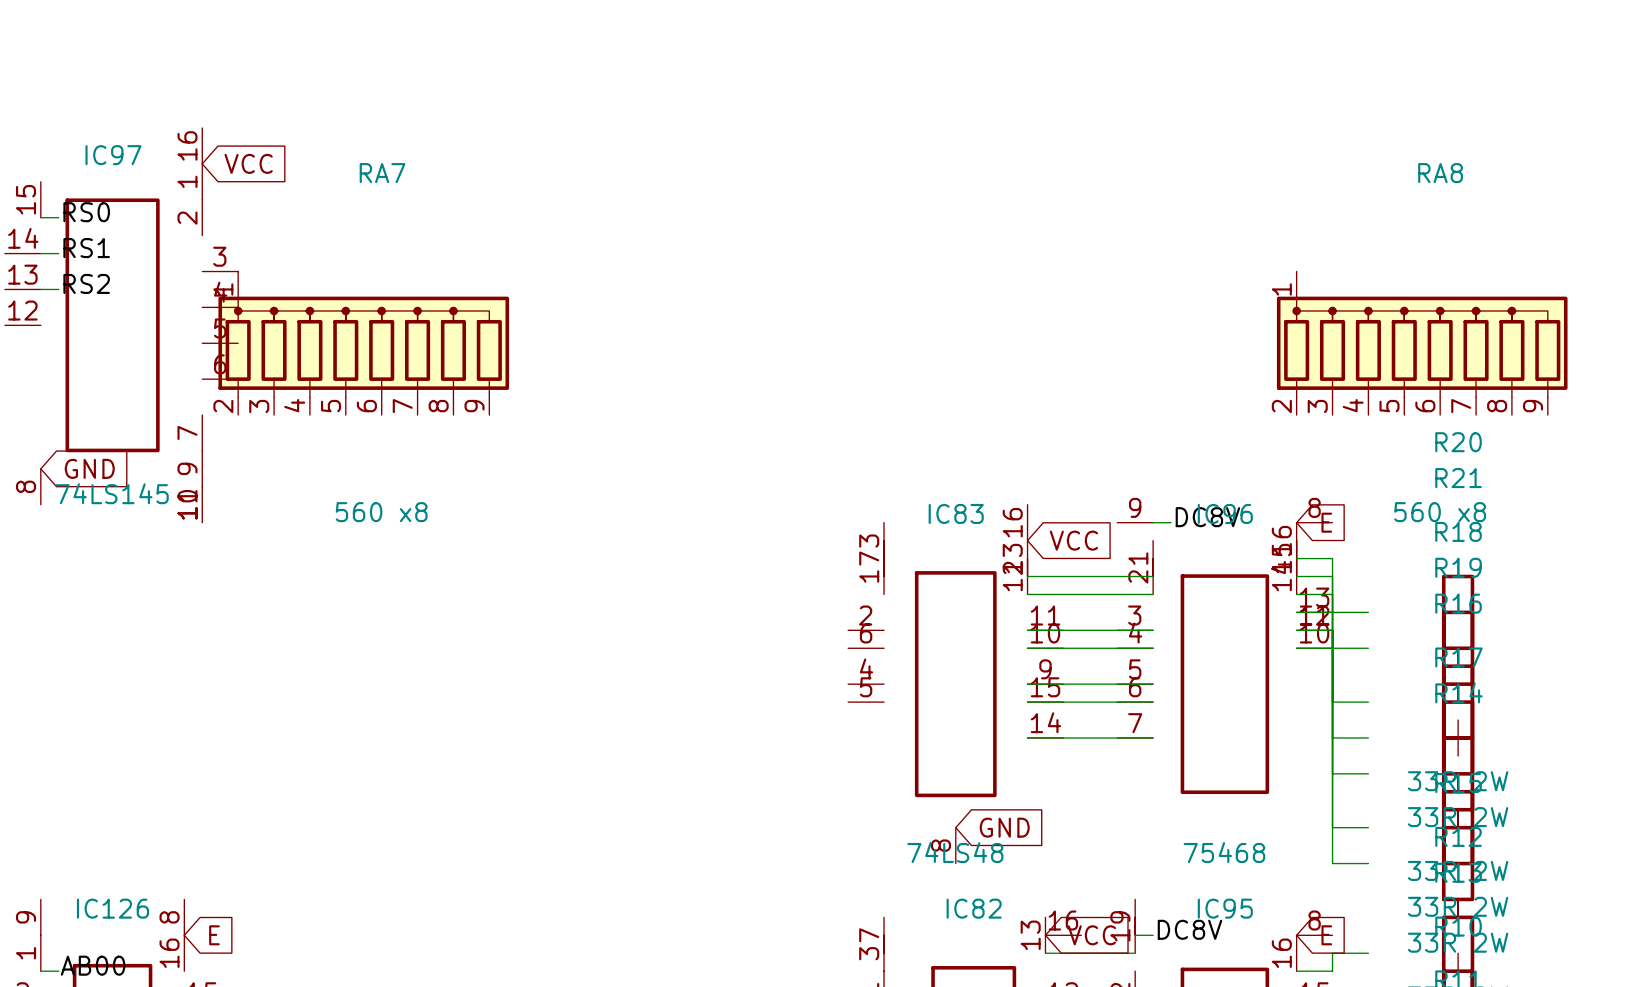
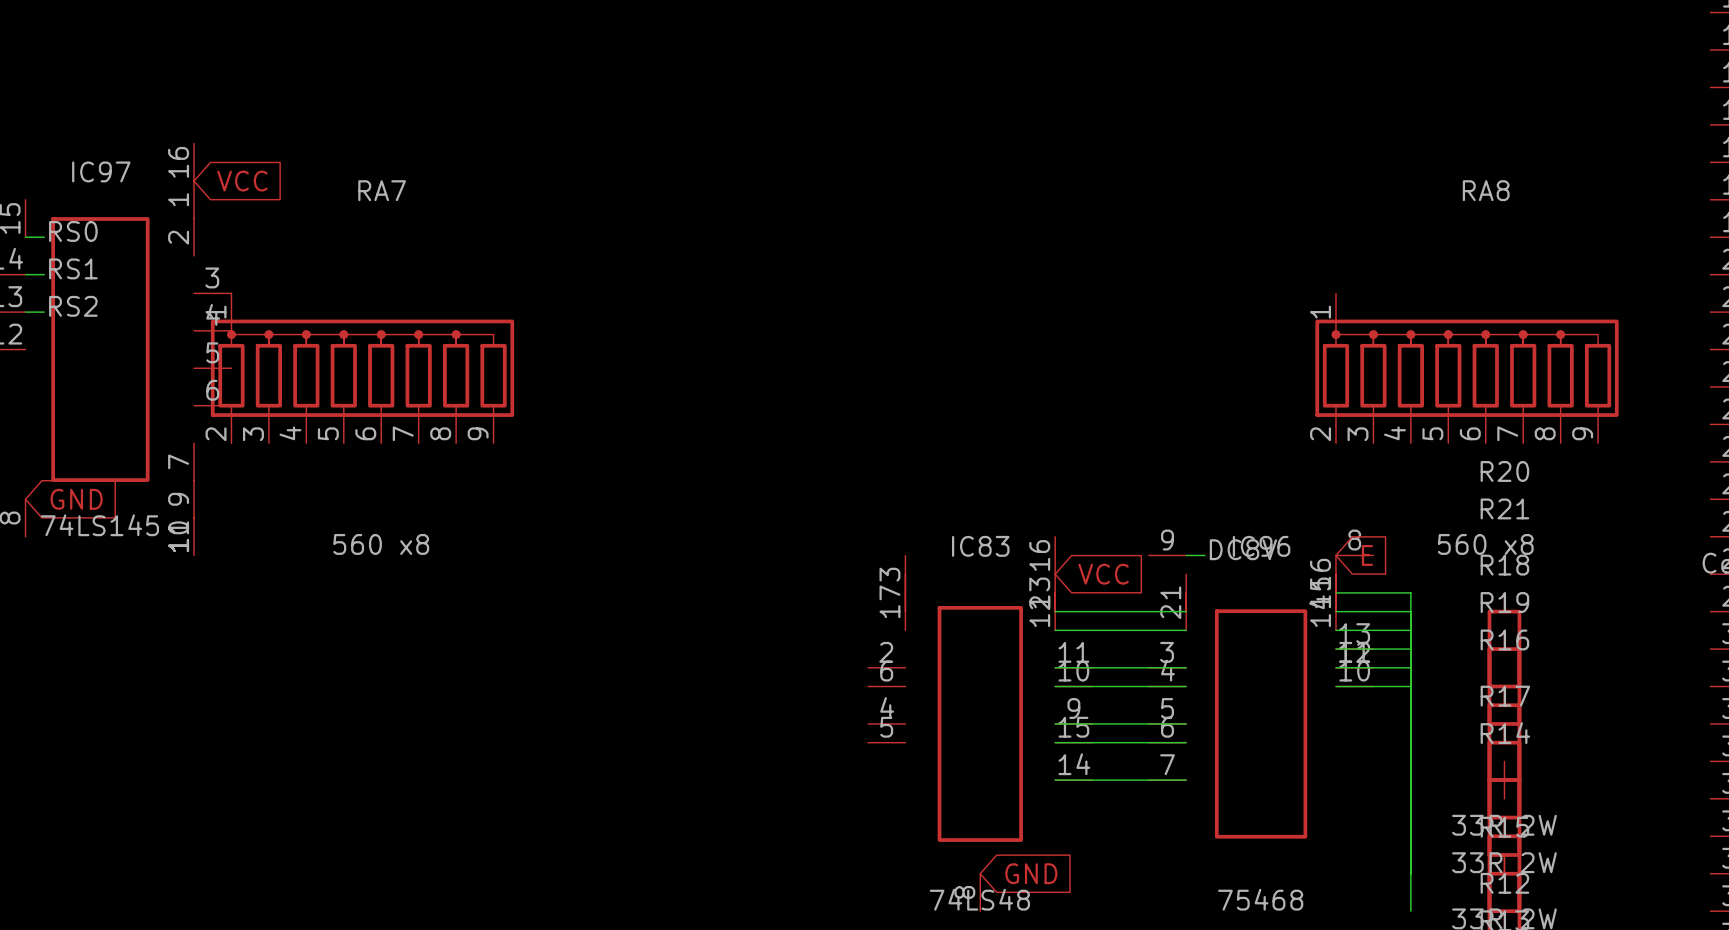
wire: (1332, 558) (1332, 863) (1368, 863) -> (1373, 592) (1410, 592) (1410, 911)
wire: (1332, 702) (1368, 702) -> (1373, 630) (1410, 630)
wire: (1332, 737) (1368, 737) -> (1373, 667) (1410, 667)
wire: (1332, 773) (1368, 773) -> (1373, 611) (1410, 611)
wire: (1332, 827) (1368, 827) -> none

